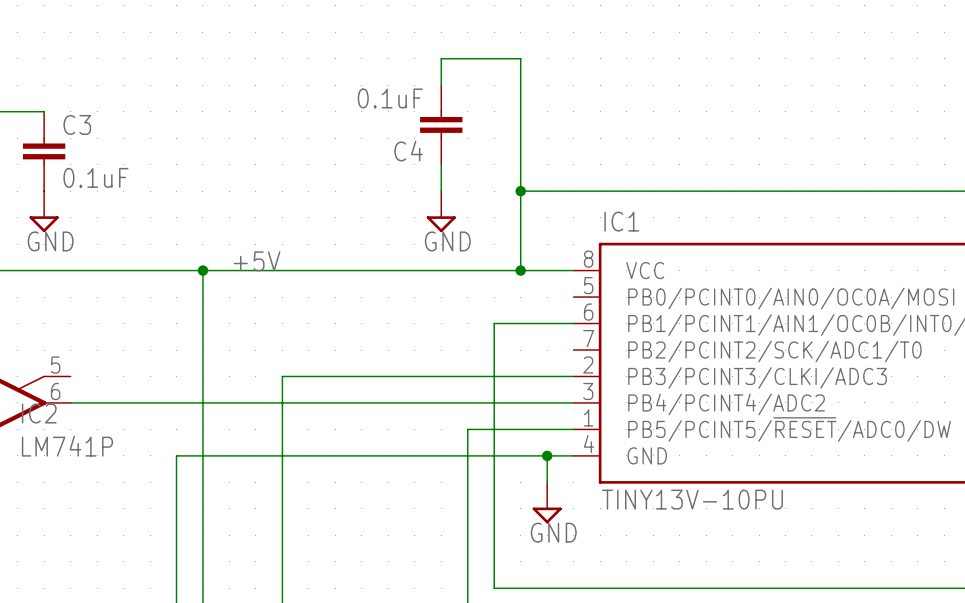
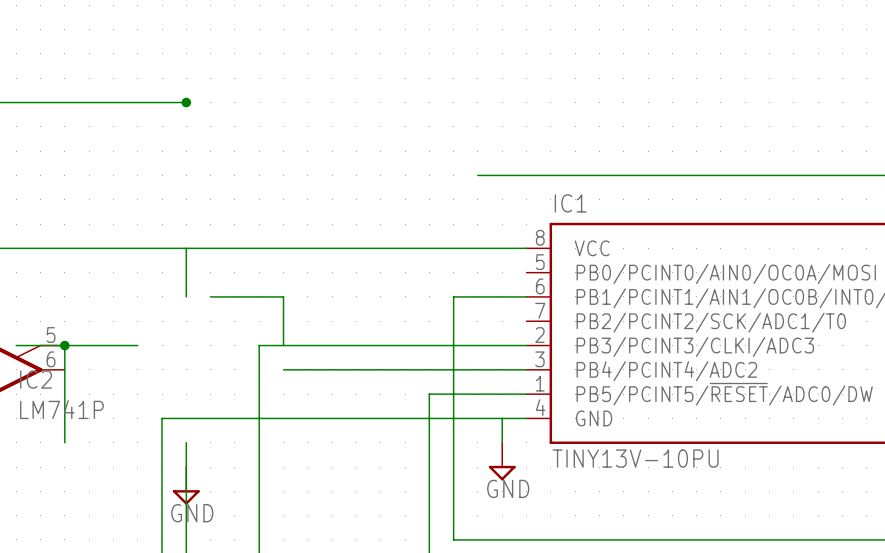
wire: (441, 85) (441, 58) (520, 58) (520, 270) -> none
wire: none -> (40, 102) (186, 102)
junction: none -> (186, 102)
C4: 0.1uF (441, 124) -> none
C3: 0.1uF (44, 151) -> none
wire: (441, 164) (441, 191) -> none
junction: (520, 191) -> none
power symbol: GND (44, 211) -> none
power symbol: GND (441, 211) -> none
label: +5V (257, 261) -> none
junction: (202, 270) -> none
junction: (520, 270) -> none
wire: (202, 323) (202, 482) -> none
wire: none -> (210, 296) (283, 296) (283, 345)
wire: none -> (16, 345) (137, 345)
wire: none -> (64, 345) (64, 442)
junction: none -> (64, 345)
wire: (70, 402) (308, 402) -> none
junction: (547, 455) -> none
power symbol: none -> GND (186, 485)

